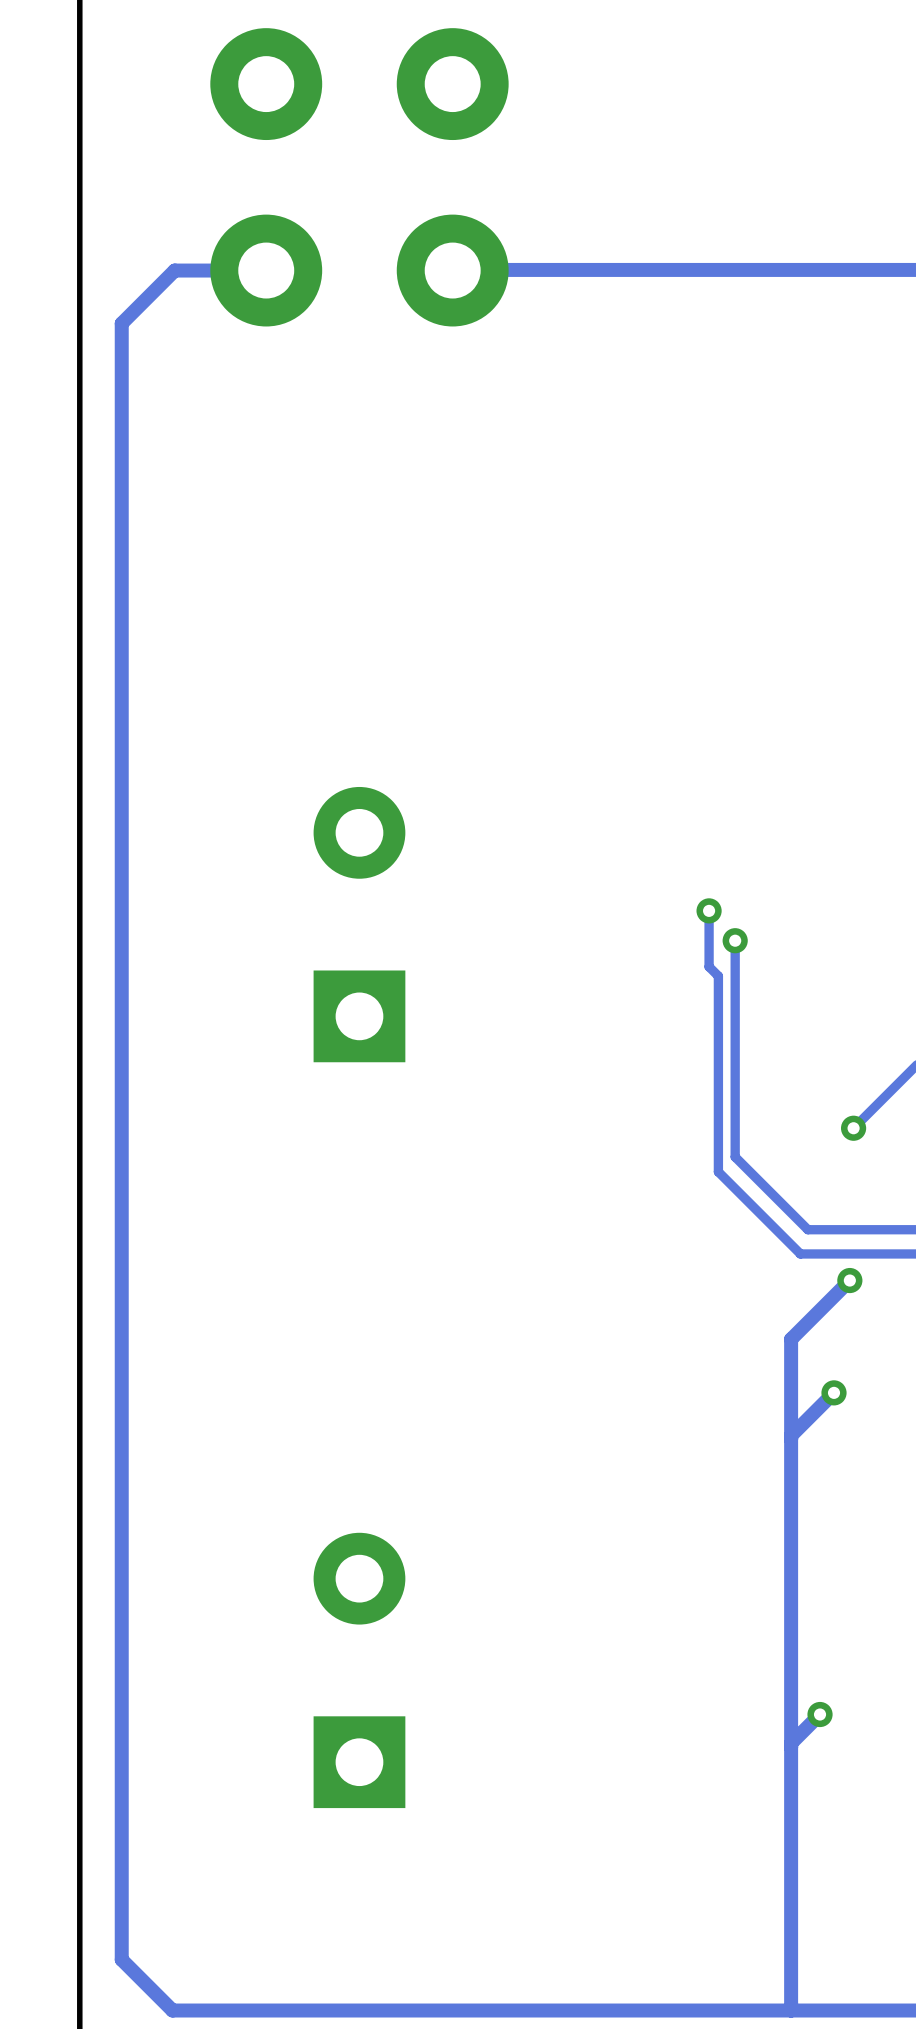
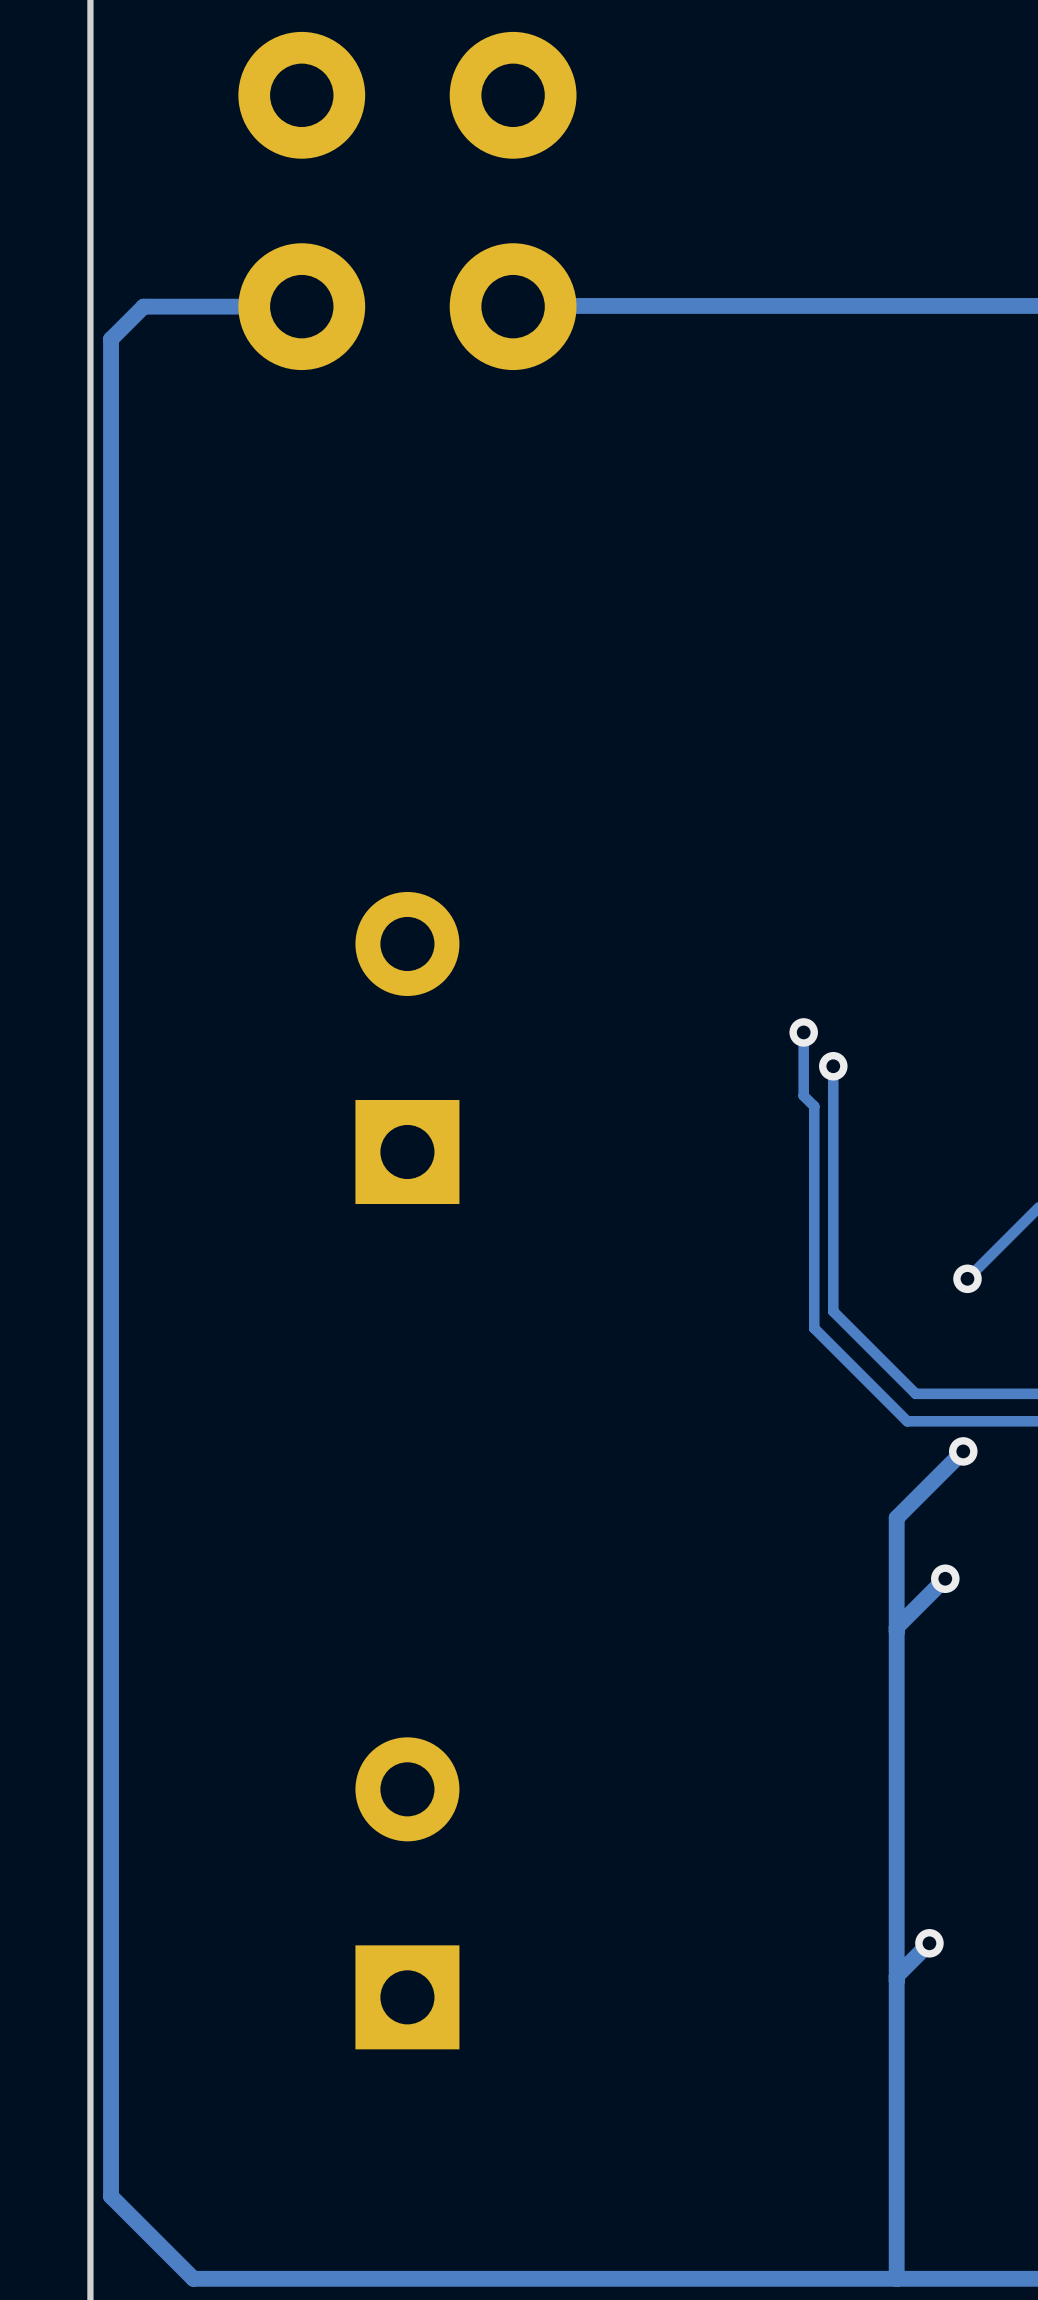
track: (174, 270) (121, 323) (121, 1959) (172, 2010) -> (198, 306) (143, 306) (111, 339) (111, 2196) (195, 2278)

